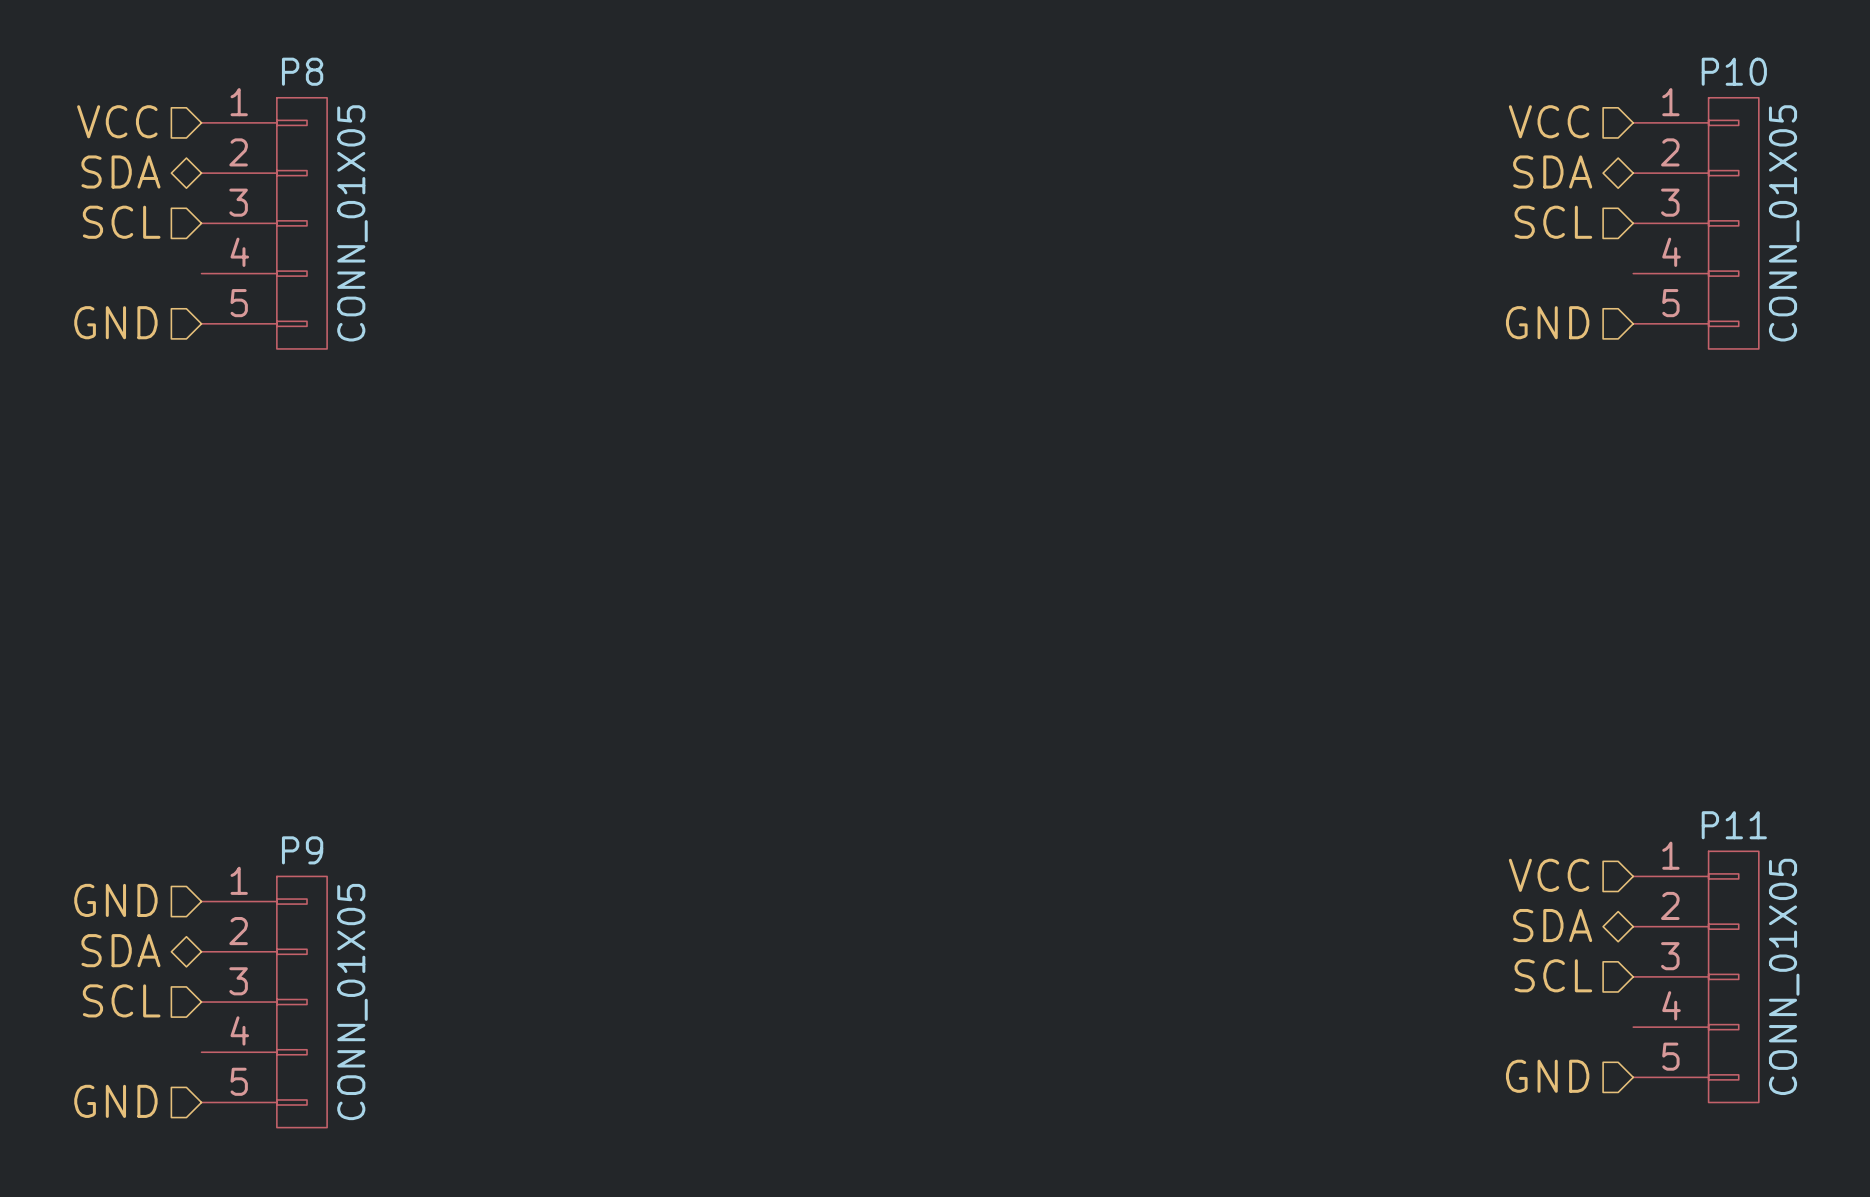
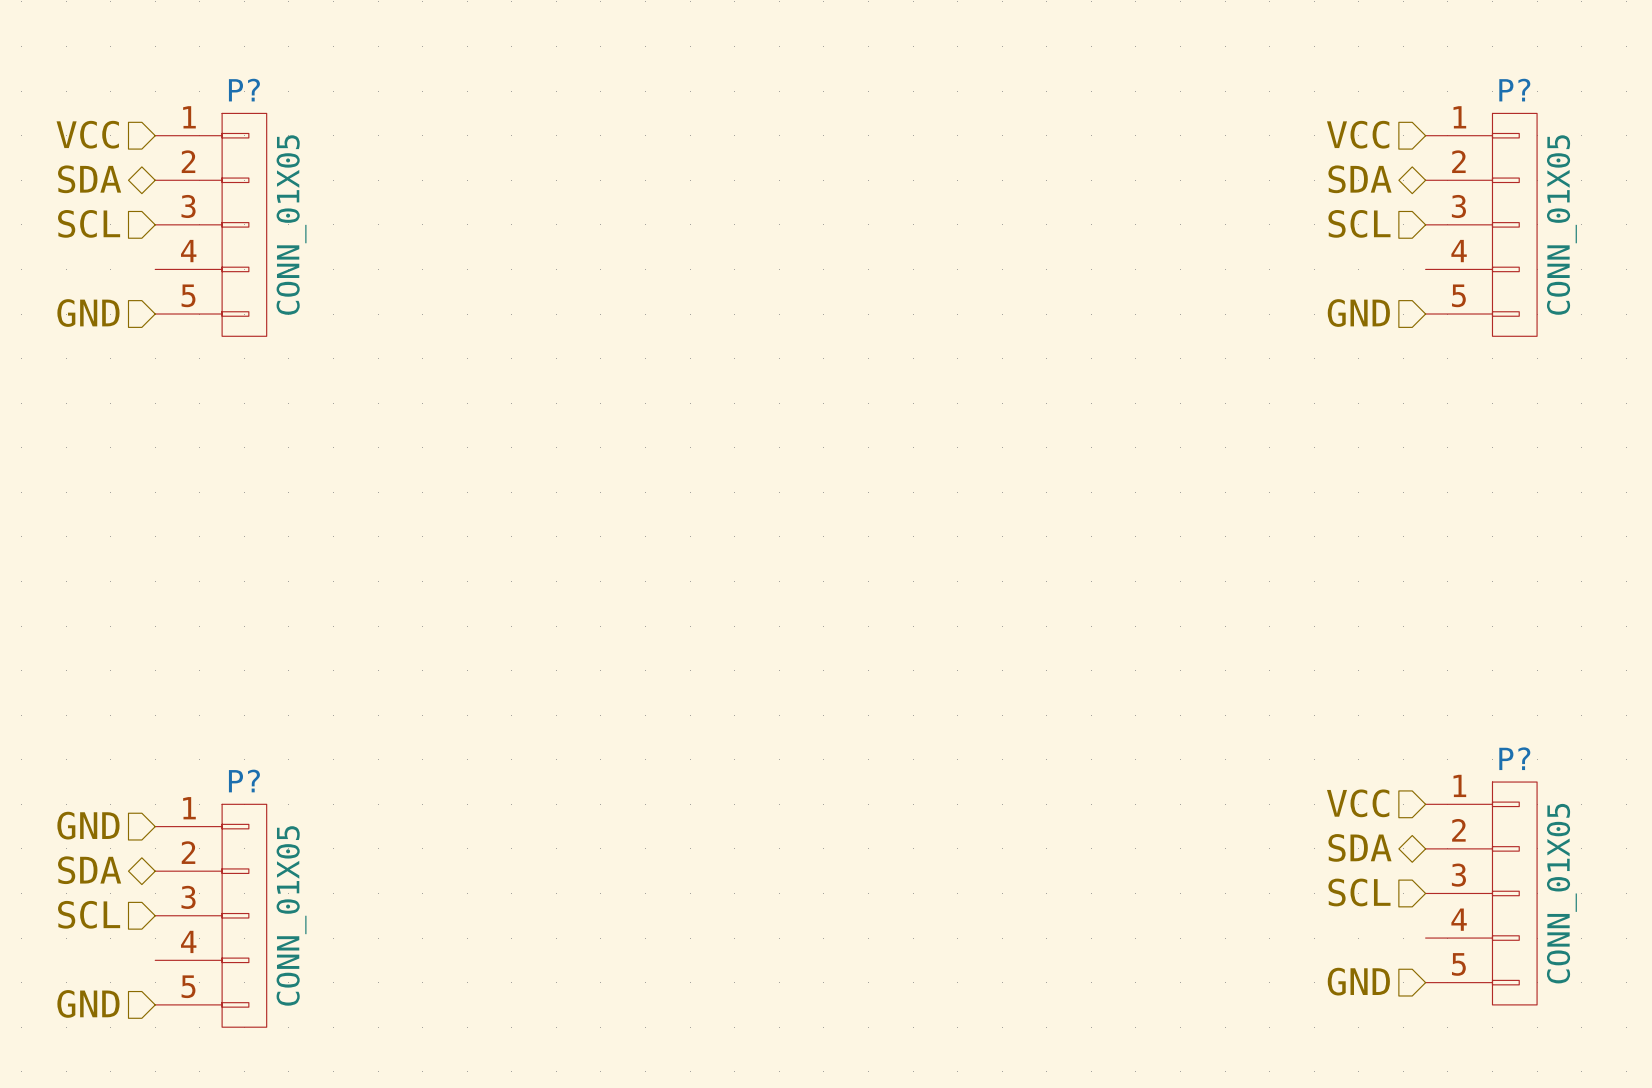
P8 name: P8 (302, 71) -> P? (244, 90)
P10 name: P10 (1734, 71) -> P? (1514, 90)
P11 name: P11 (1734, 825) -> P? (1514, 758)
P9 name: P9 (302, 850) -> P? (244, 781)

